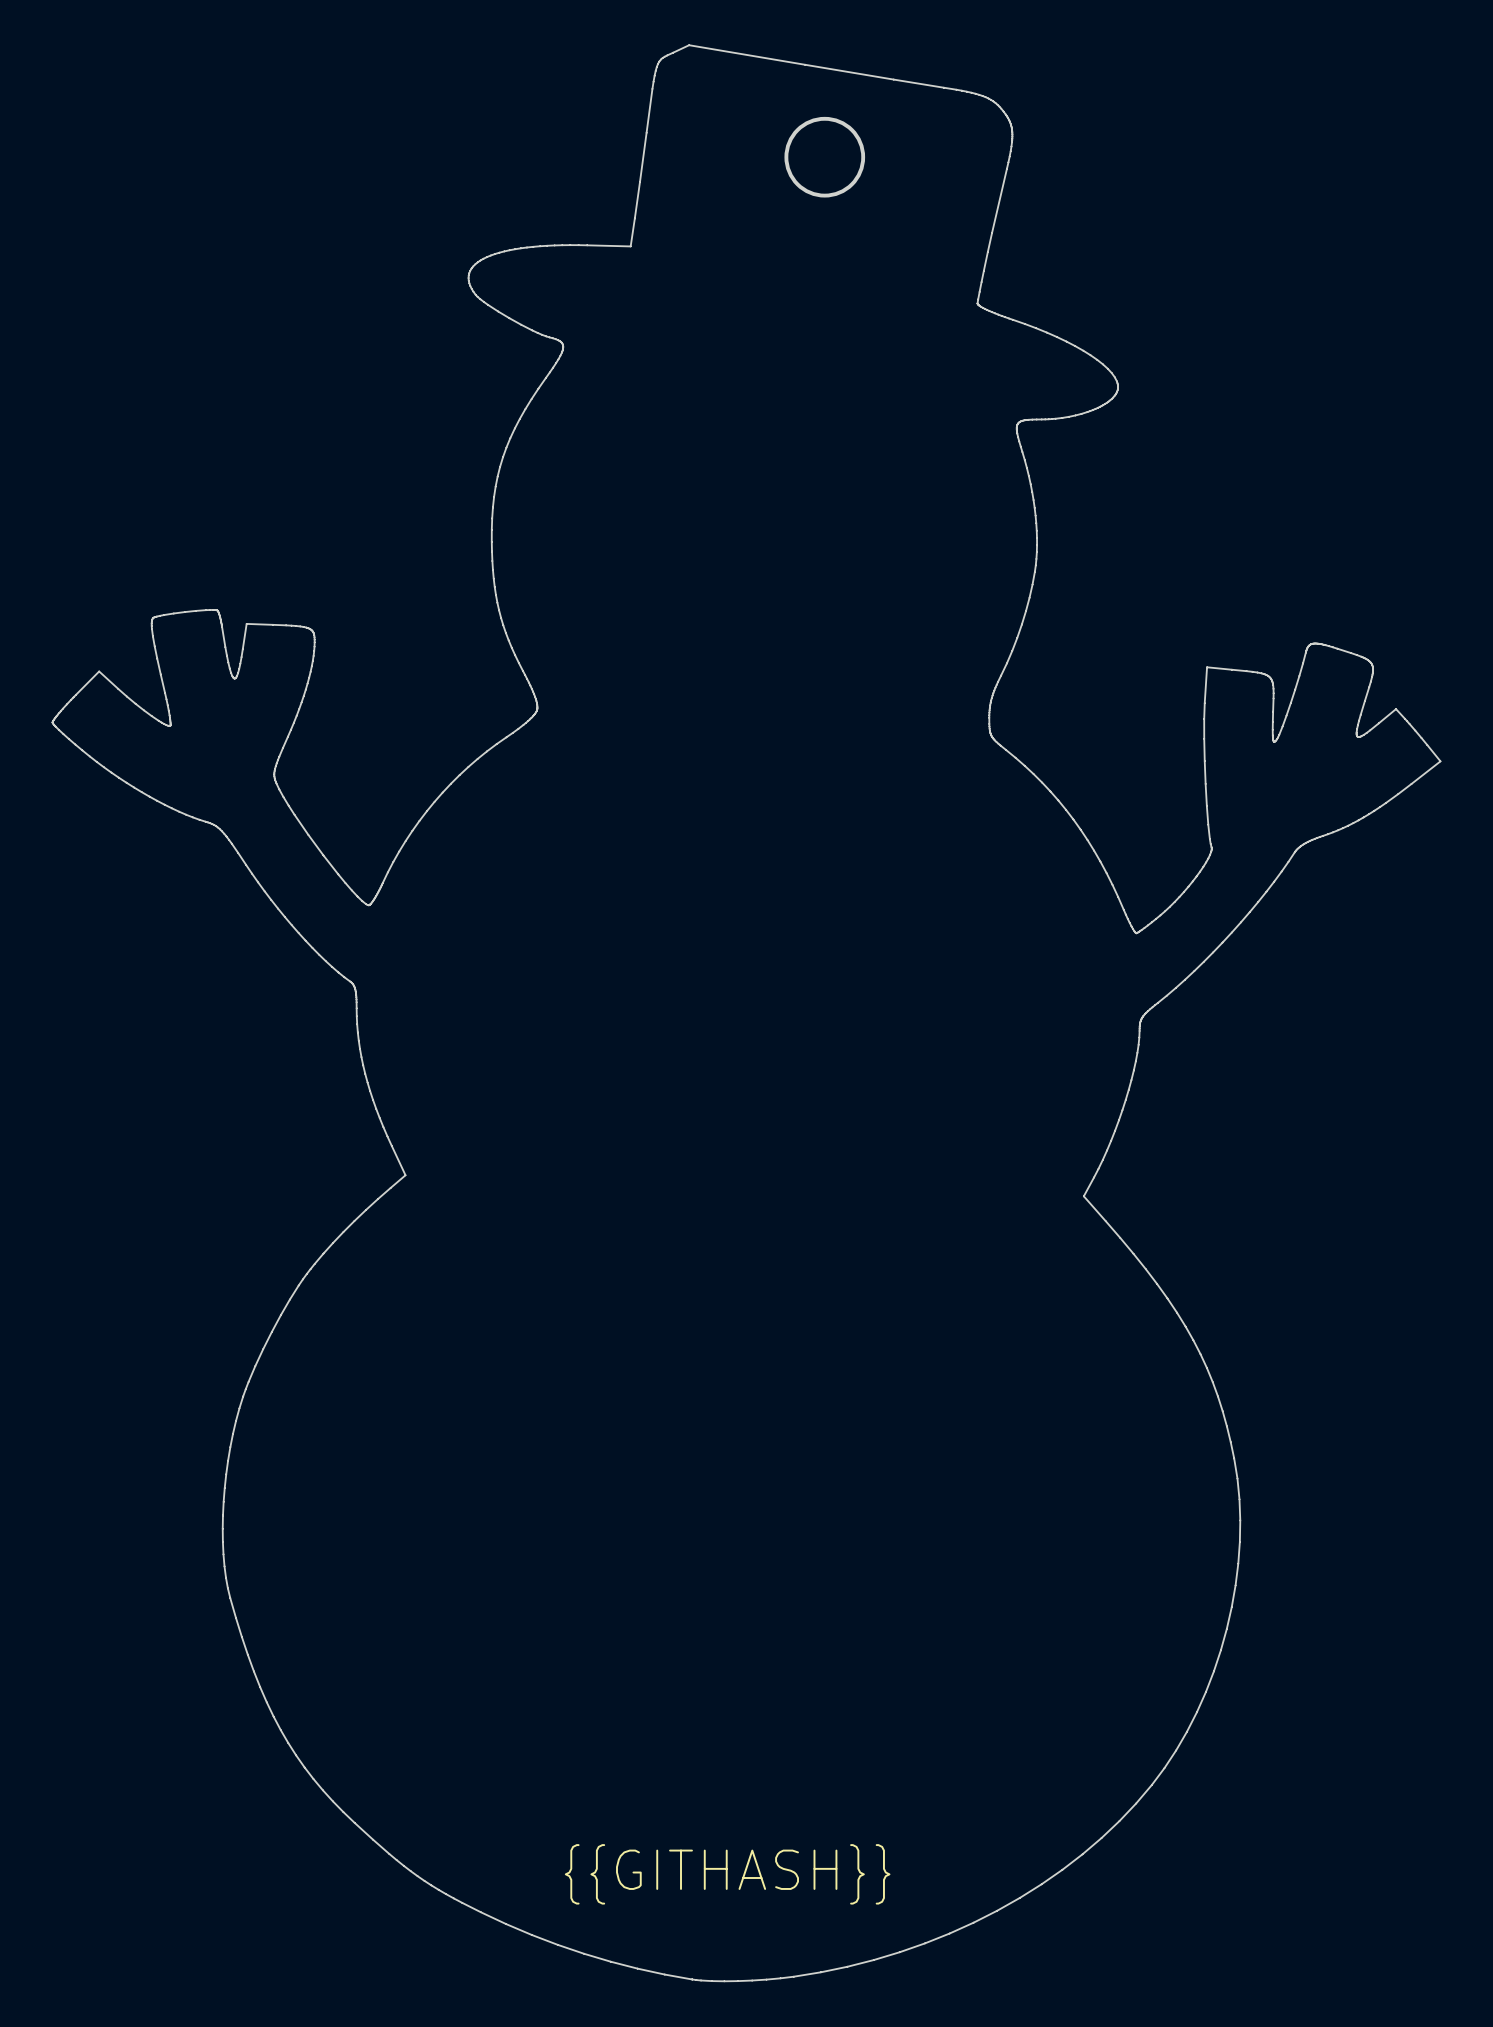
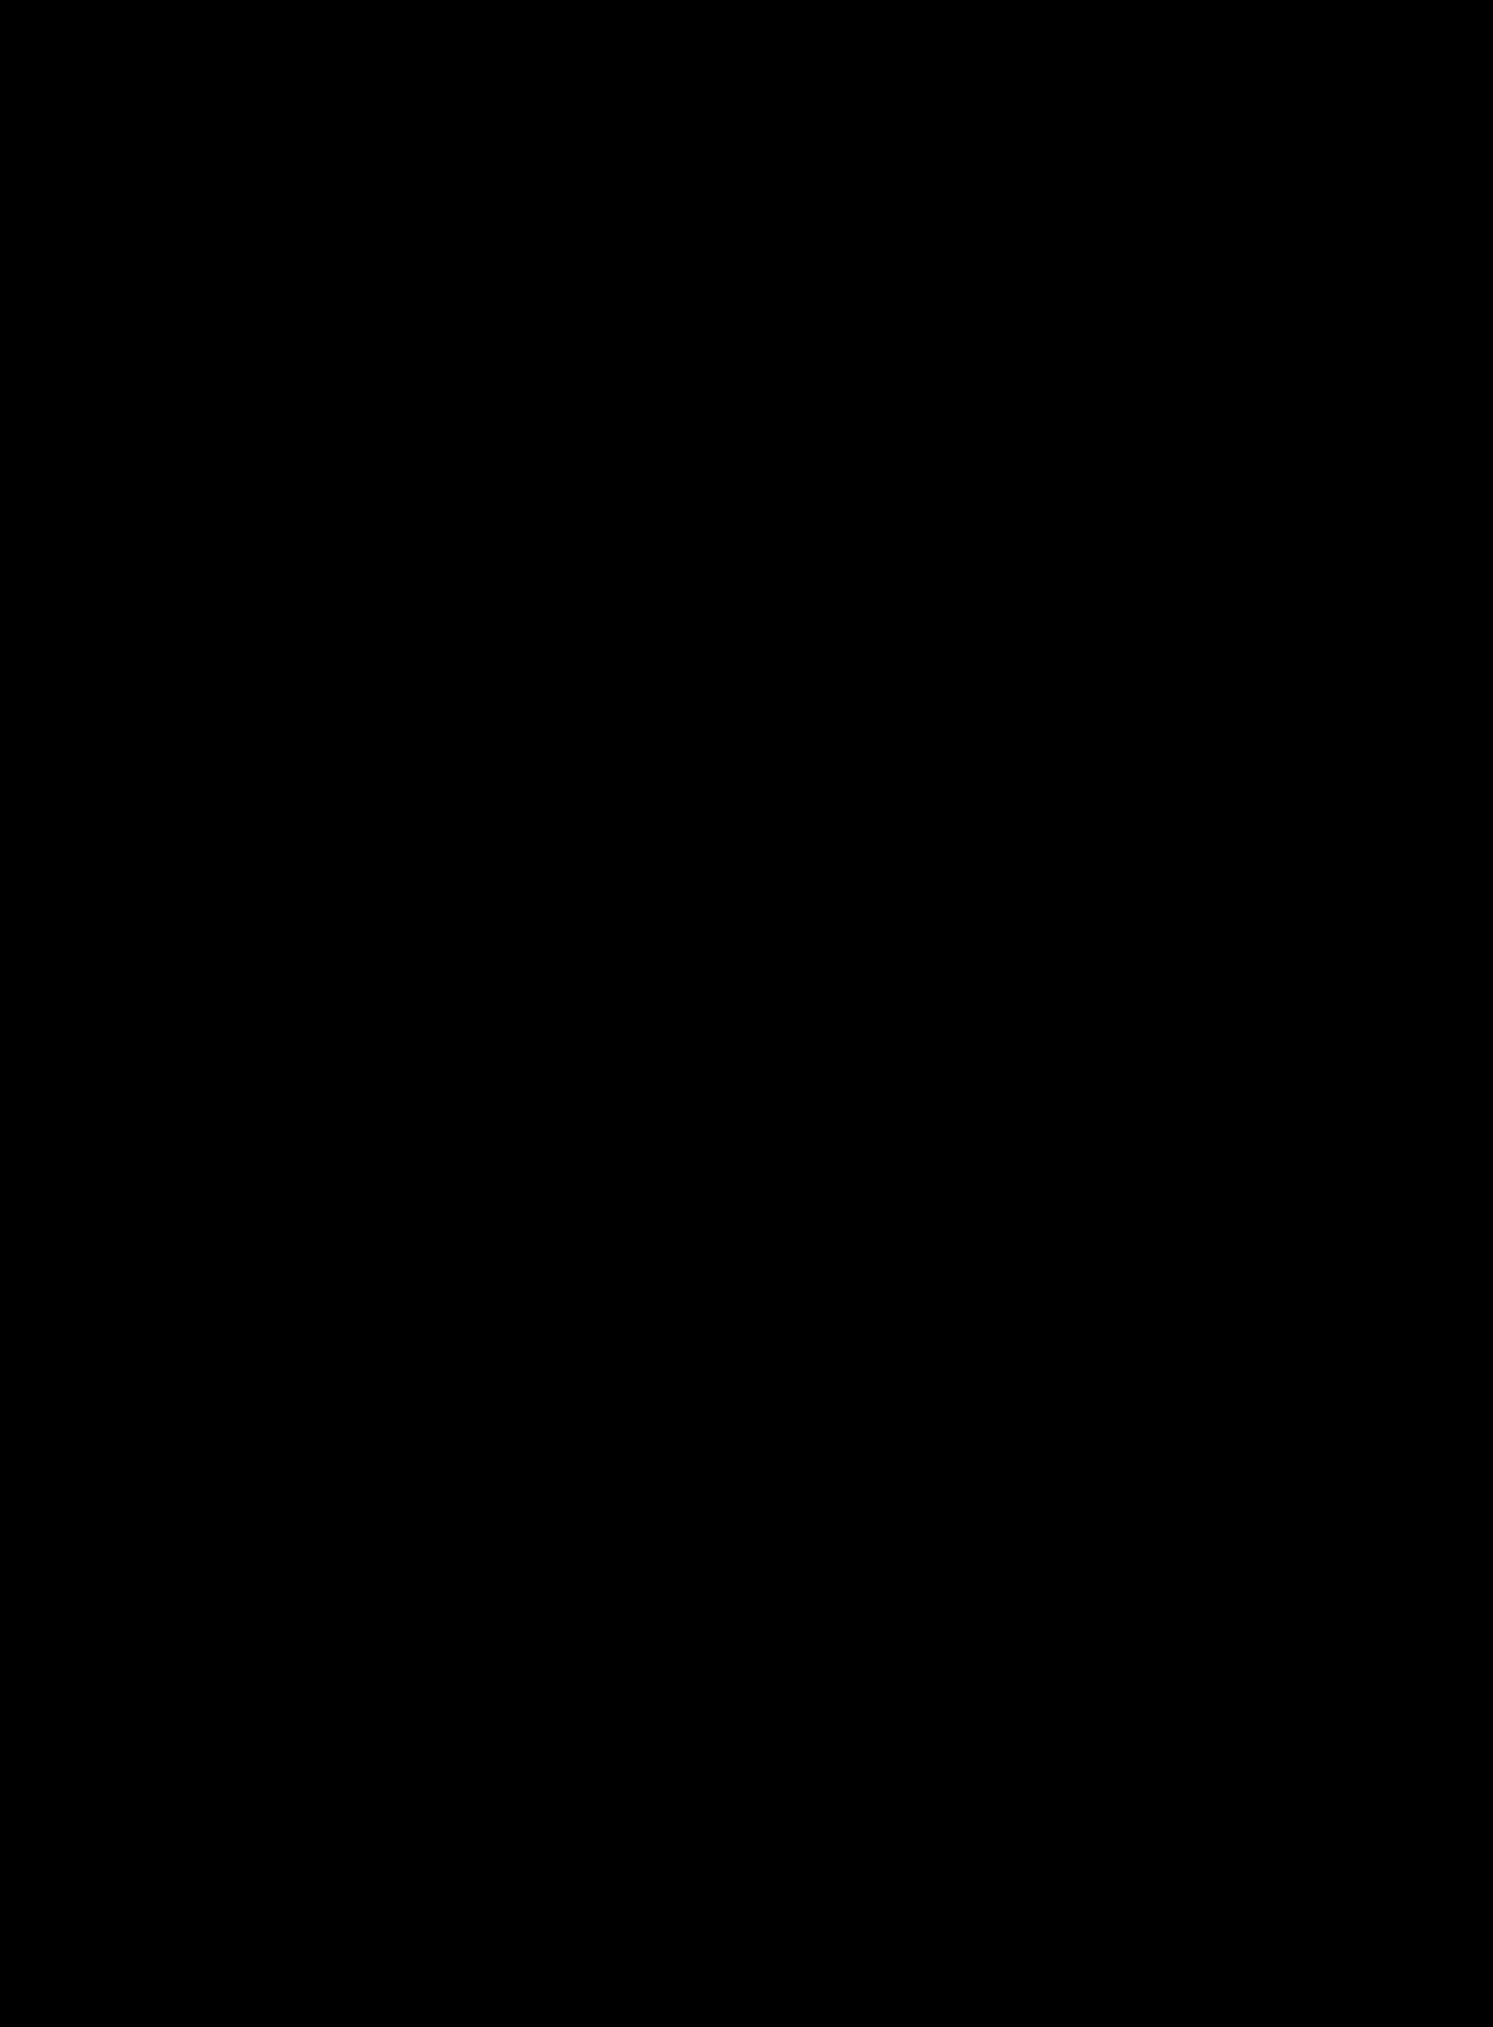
round board edge: [784, 116, 866, 198] -> none
board edge: (977, 303) (1012, 140) (1009, 121) (995, 103) (982, 95) (961, 90) (689, 45) (660, 59) (656, 67) (653, 81) (630, 246) (562, 245) (515, 249) (483, 258) (473, 266) (469, 273) (470, 286) (480, 299) (521, 324) (559, 340) (563, 345) (558, 359) (525, 409) (510, 438) (500, 466) (492, 507) (492, 561) (497, 602) (505, 632) (533, 691) (537, 708) (525, 722) (468, 766) (434, 801) (405, 840) (369, 904) -> none
board edge: (977, 304) (989, 310) (1046, 332) (1075, 346) (1102, 364) (1111, 373) (1117, 383) (1117, 390) (1113, 397) (1092, 410) (1062, 417) (1023, 420) (1017, 424) (1017, 433) (1028, 476) (1034, 507) (1036, 558) (1032, 584) (1021, 624) (991, 698) (989, 723) (990, 733) (994, 739) (1042, 782) (1080, 829) (1106, 873) (1135, 933) -> none
board edge: (217, 610) (184, 612) (152, 618) (152, 636) (170, 725) -> none
board edge: (217, 611) (229, 668) (234, 678) (239, 669) (246, 623) (300, 626) (308, 628) (313, 632) (314, 651) (309, 677) (299, 709) (276, 763) (274, 778) (288, 805) (323, 855) (351, 890) (368, 905) -> none
board edge: (52, 722) (66, 704) (99, 671) (143, 710) (170, 725) -> none
board edge: (52, 722) (82, 750) (126, 782) (171, 808) (218, 827) (291, 925) (325, 961) (352, 983) (356, 994) (359, 1048) (367, 1082) (383, 1127) (405, 1175) (343, 1232) (314, 1264) (298, 1285) (280, 1315) (255, 1366) (243, 1396) (233, 1433) (226, 1474) (222, 1515) (225, 1577) (247, 1654) (266, 1702) (280, 1730) (304, 1767) (343, 1812) (403, 1865) (446, 1894) (506, 1924) (584, 1953) (664, 1974) (696, 1980) (724, 1981) (793, 1976) (873, 1960) (949, 1933) (1019, 1898) (1082, 1854) (1136, 1803) (1176, 1750) (1205, 1692) (1226, 1628) (1238, 1563) (1239, 1499) (1234, 1458) (1226, 1426) (1206, 1368) (1176, 1312) (1133, 1253) (1083, 1196) (1107, 1150) (1122, 1110) (1133, 1070) (1140, 1023) (1143, 1015) (1194, 970) (1231, 932) (1266, 891) (1298, 847) (1369, 814) (1440, 761) (1396, 709) (1366, 732) (1357, 736) (1357, 725) (1372, 674) (1372, 665) (1361, 656) (1318, 643) (1311, 644) (1307, 648) (1286, 715) (1274, 741) -> none
board edge: (1273, 741) (1273, 688) (1269, 677) (1257, 672) (1207, 667) (1204, 718) (1204, 761) (1211, 851) (1200, 871) (1179, 896) (1160, 915) (1136, 933) -> none
text: {{GITHASH}} (727, 1874) -> none

